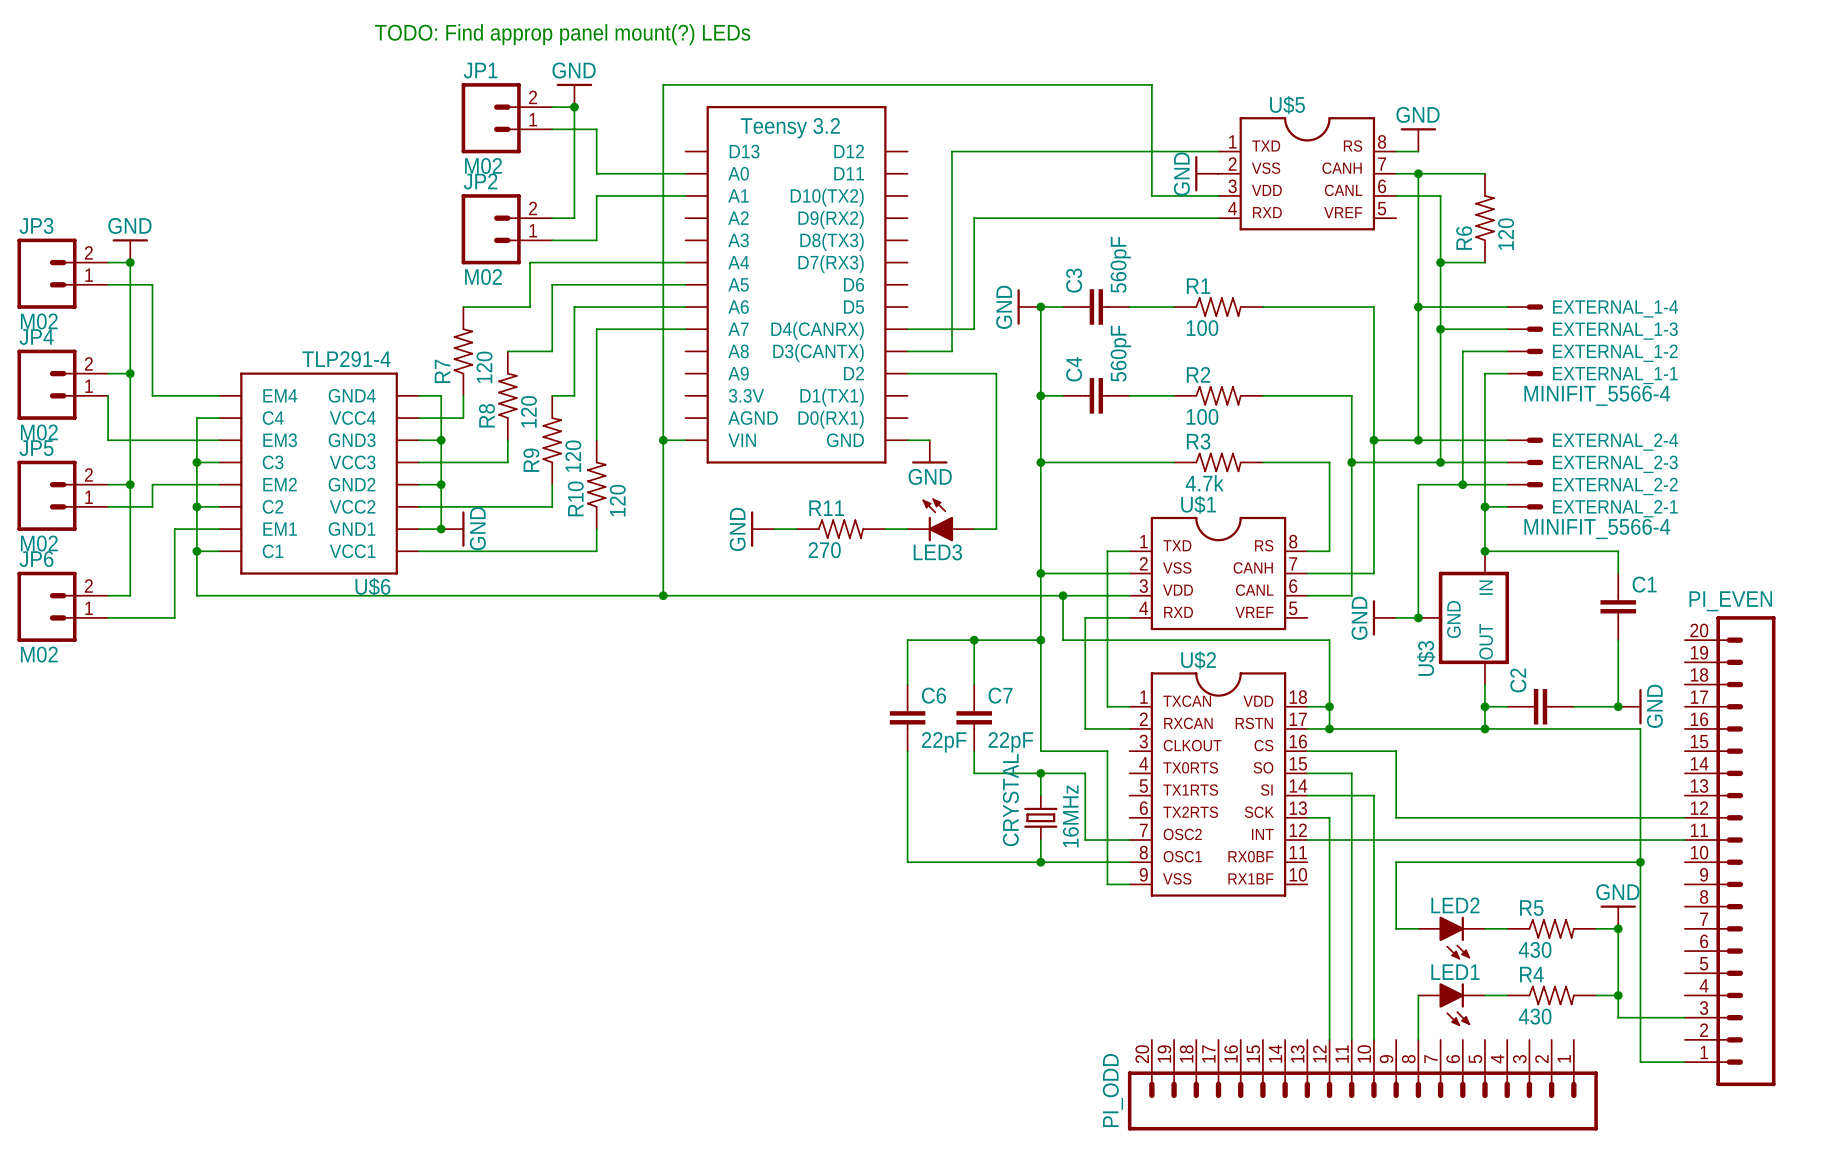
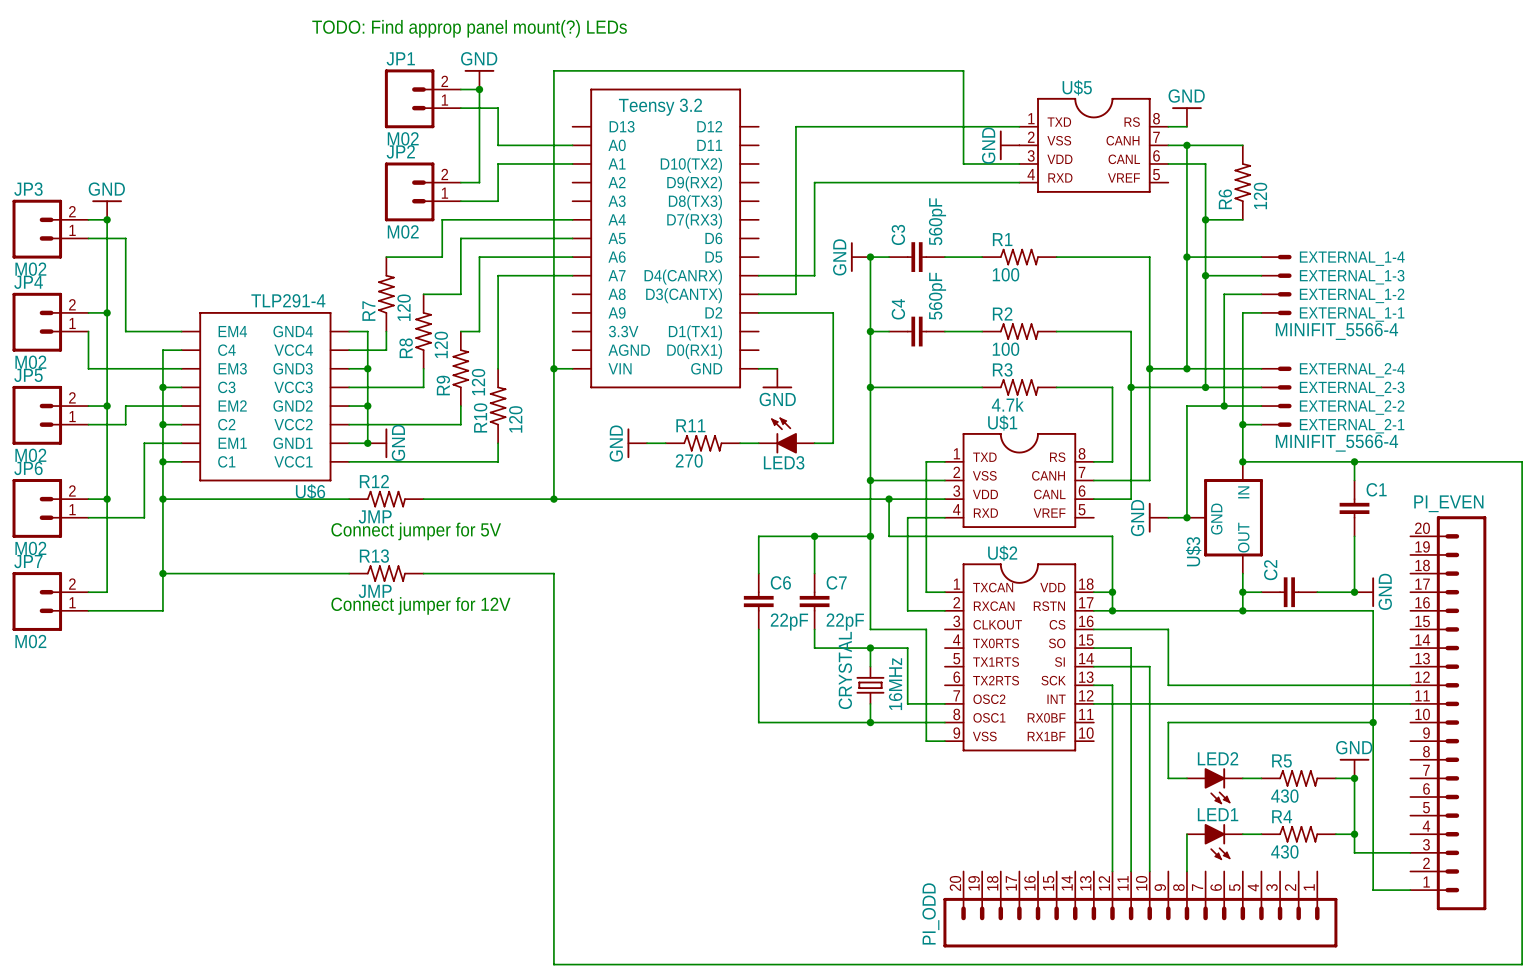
wire: none -> (1354, 461) (1522, 461) (1522, 964) (553, 964) (553, 573) (423, 573)
junction: none -> (1354, 461)
wire: none -> (107, 499) (107, 592) (88, 592)
junction: none -> (107, 499)
wire: none -> (162, 499) (162, 610) (88, 610)
junction: none -> (162, 499)
R12: none -> JMP (386, 499)
text: none -> Connect jumper for 5V (416, 531)
wire: none -> (162, 573) (349, 573)
junction: none -> (162, 573)
R13: none -> JMP (386, 573)
JP7: none -> M02 (50, 601)
text: none -> Connect jumper for 12V (420, 605)

